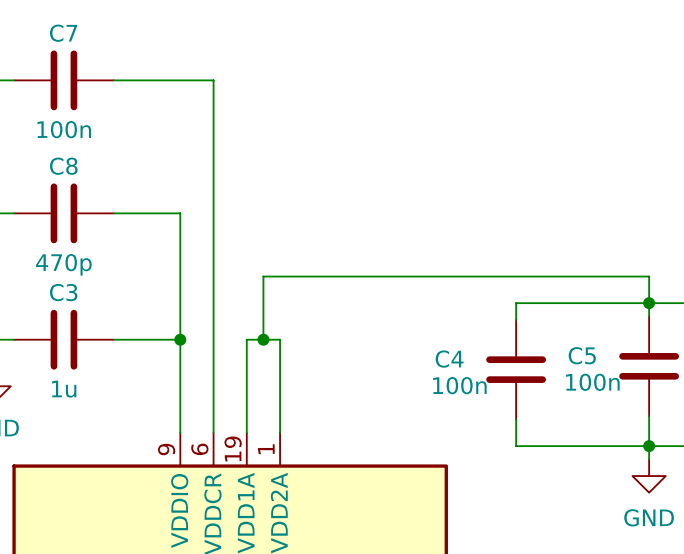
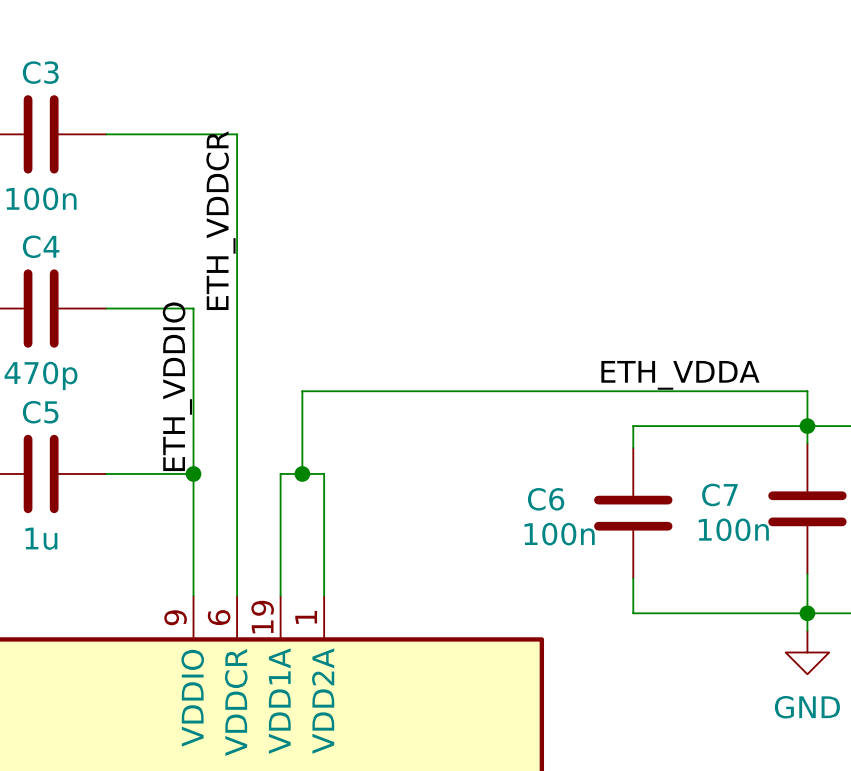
C7 name: C7 (63, 33) -> C3 (40, 72)
label: none -> ETH_VDDCR (220, 220)
C8 name: C8 (63, 166) -> C4 (41, 246)
label: none -> ETH_VDDA (680, 375)
label: none -> ETH_VDDIO (177, 386)
C3 name: C3 (63, 292) -> C5 (40, 412)
C5 name: C5 (582, 355) -> C7 (719, 494)
C4 name: C4 (449, 359) -> C6 (546, 499)

